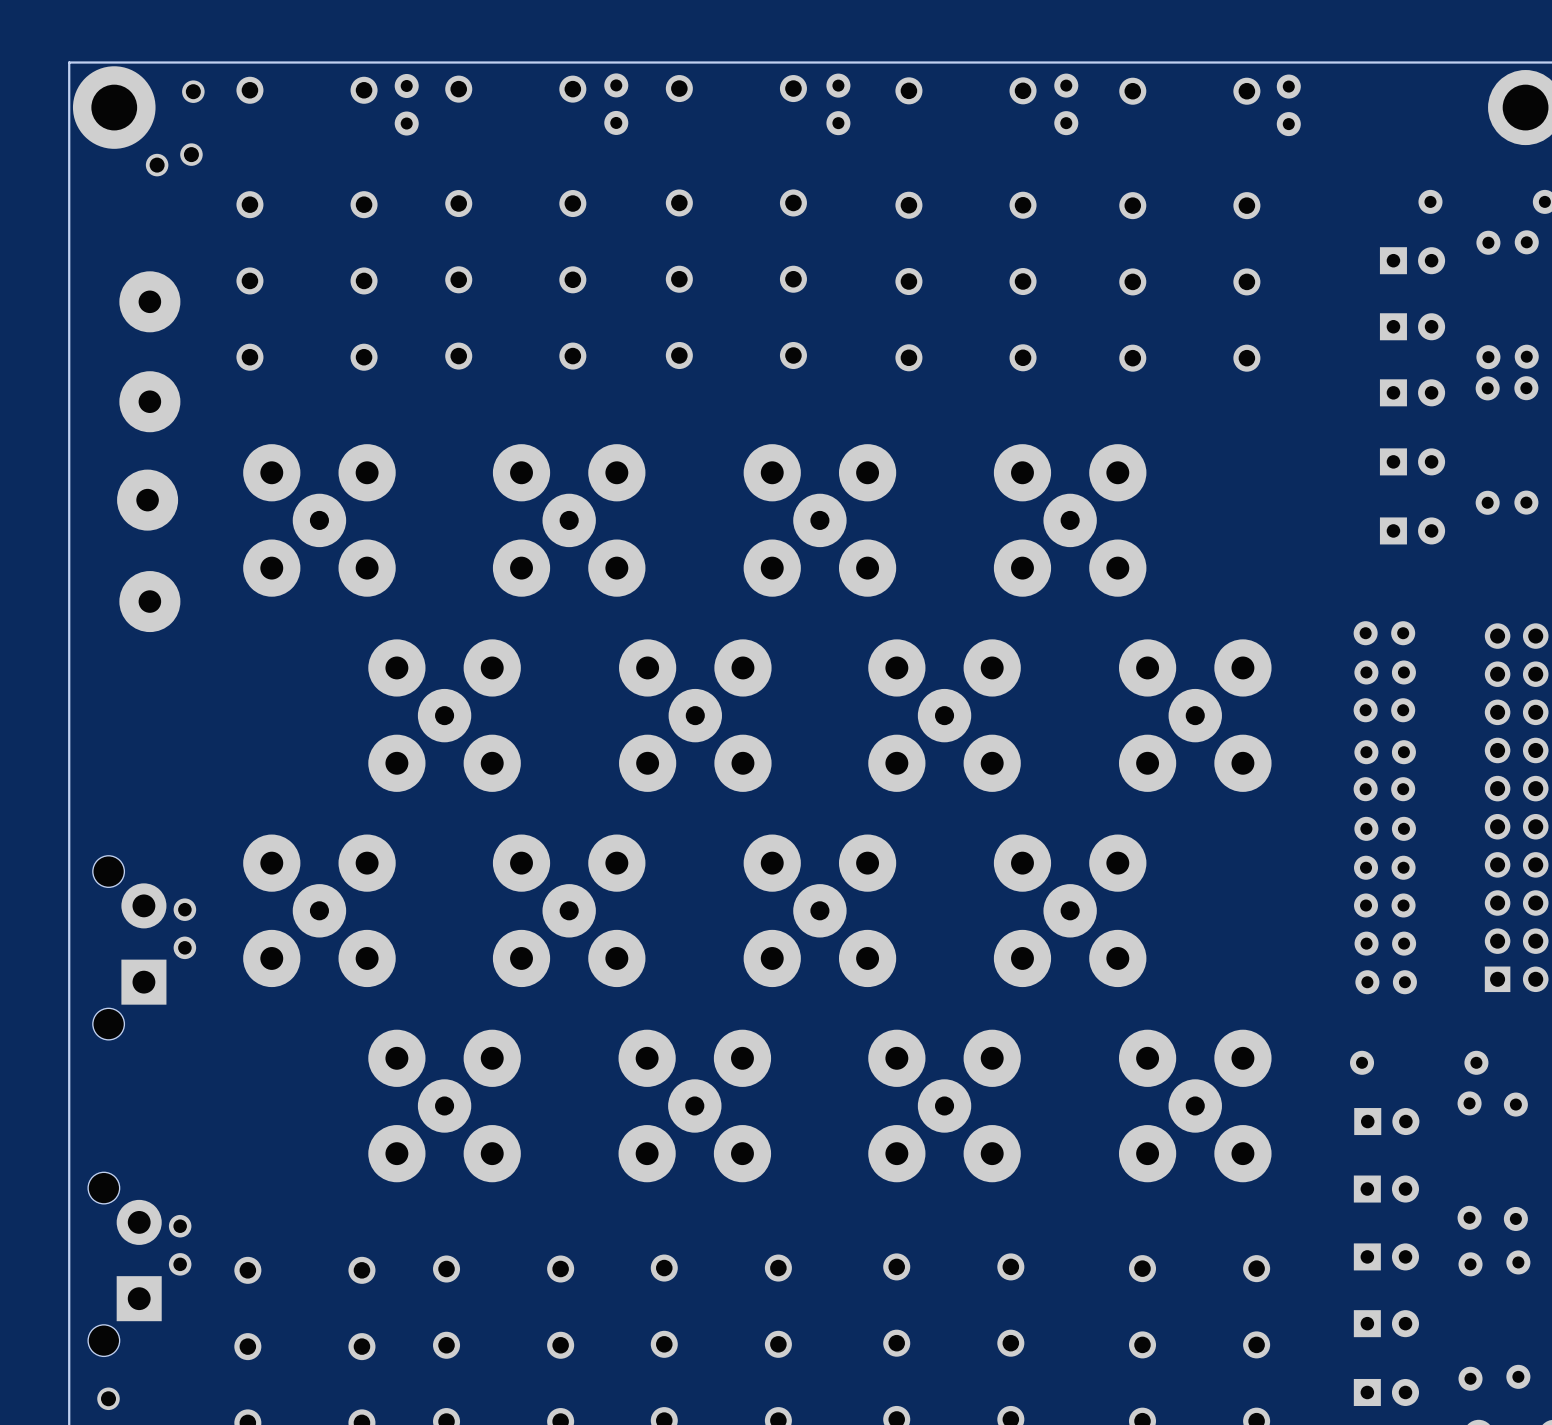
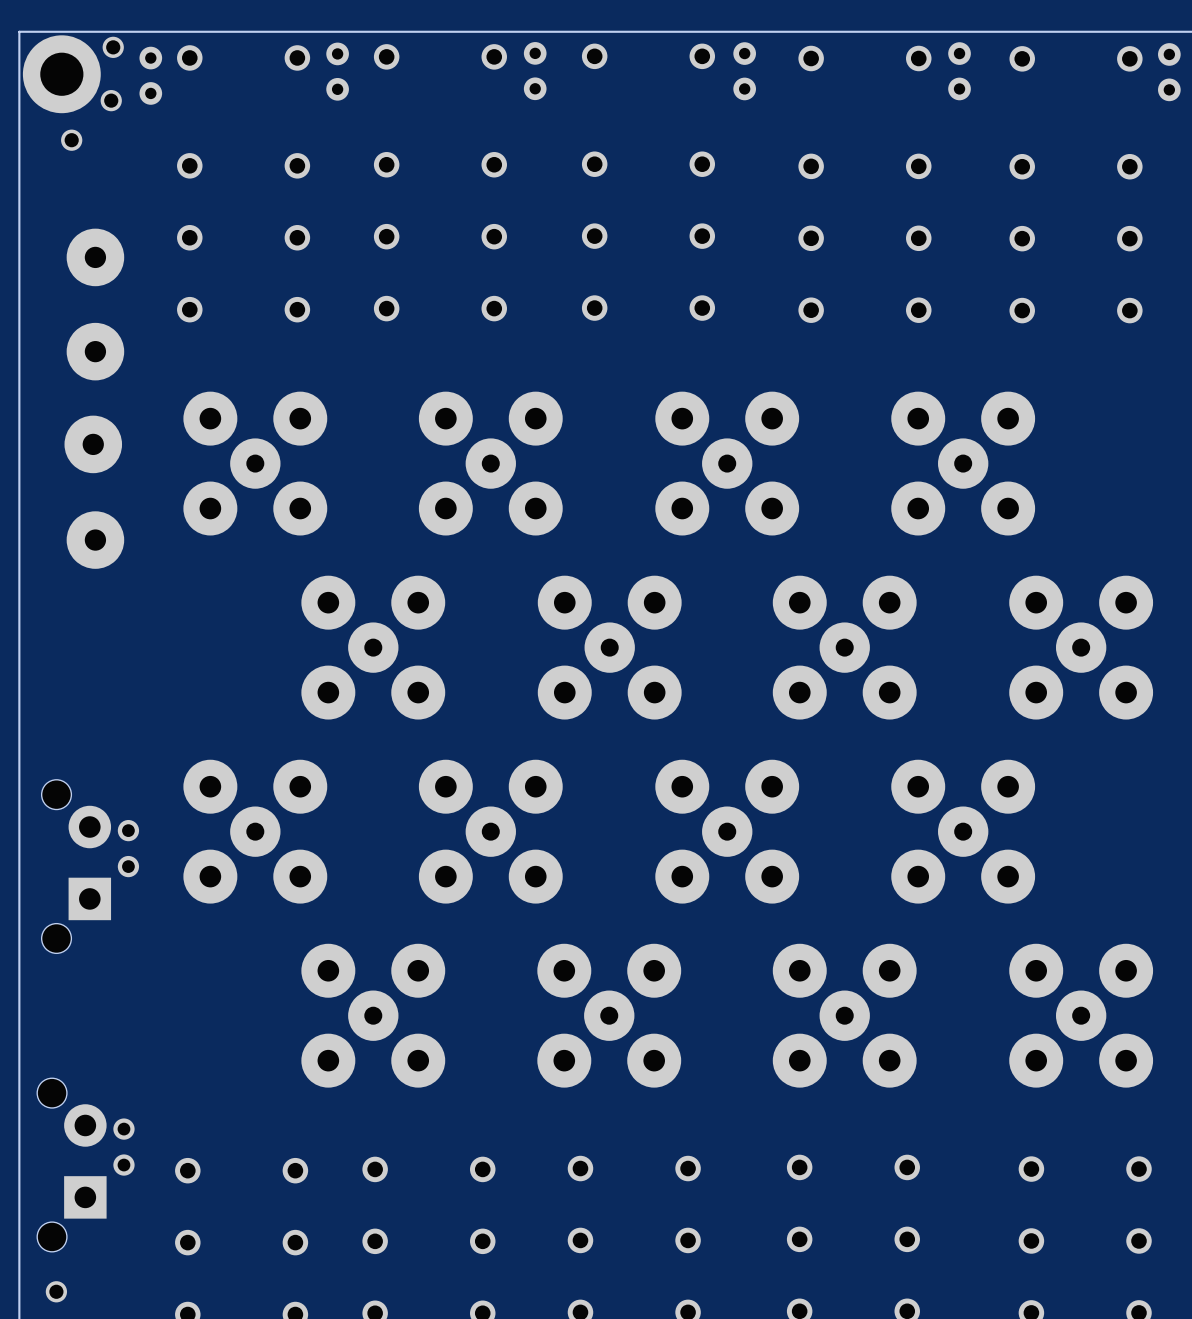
part: none -> (113, 47)
part: (193, 91) -> none
part: none -> (150, 75)
part: none -> (111, 100)
part: (191, 154) -> none
part: (157, 165) -> none
part: none -> (71, 140)

